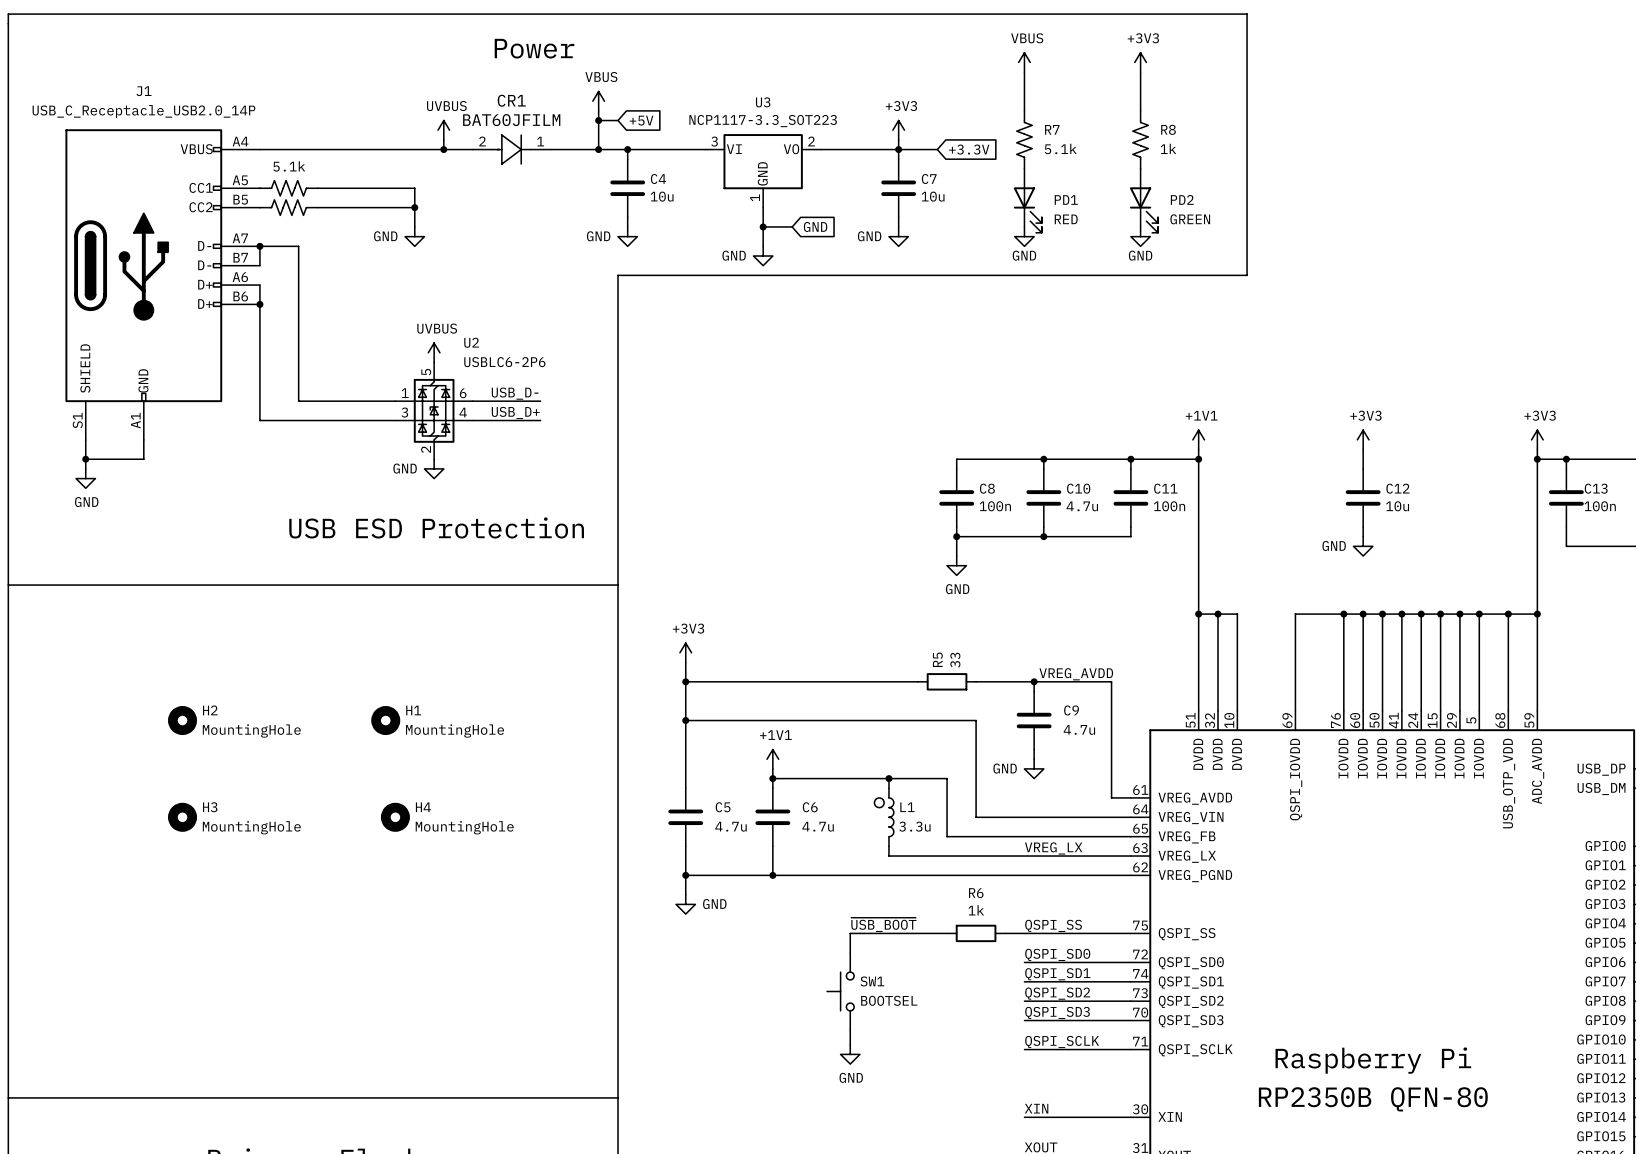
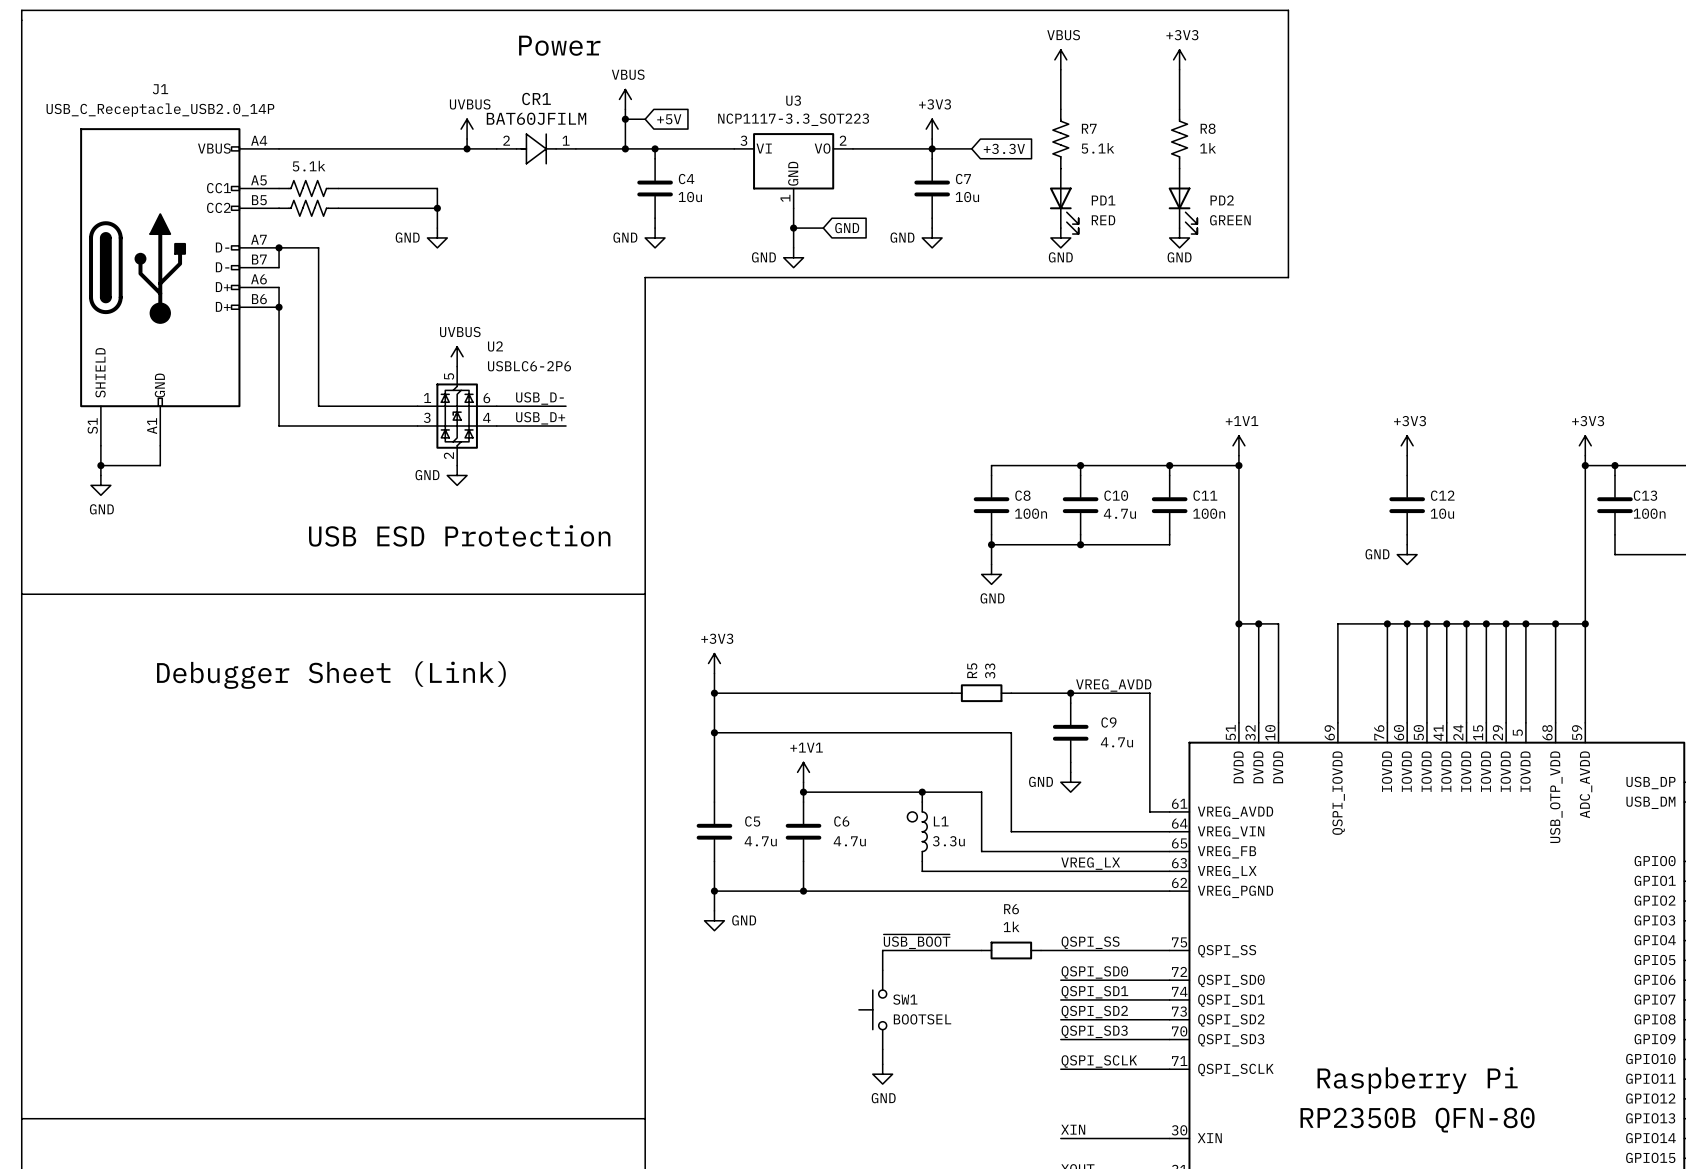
text: none -> Debugger Sheet (Link) (331, 675)
H2: MountingHole (182, 720) -> none
H1: MountingHole (385, 720) -> none
H3: MountingHole (182, 817) -> none
H4: MountingHole (395, 817) -> none

